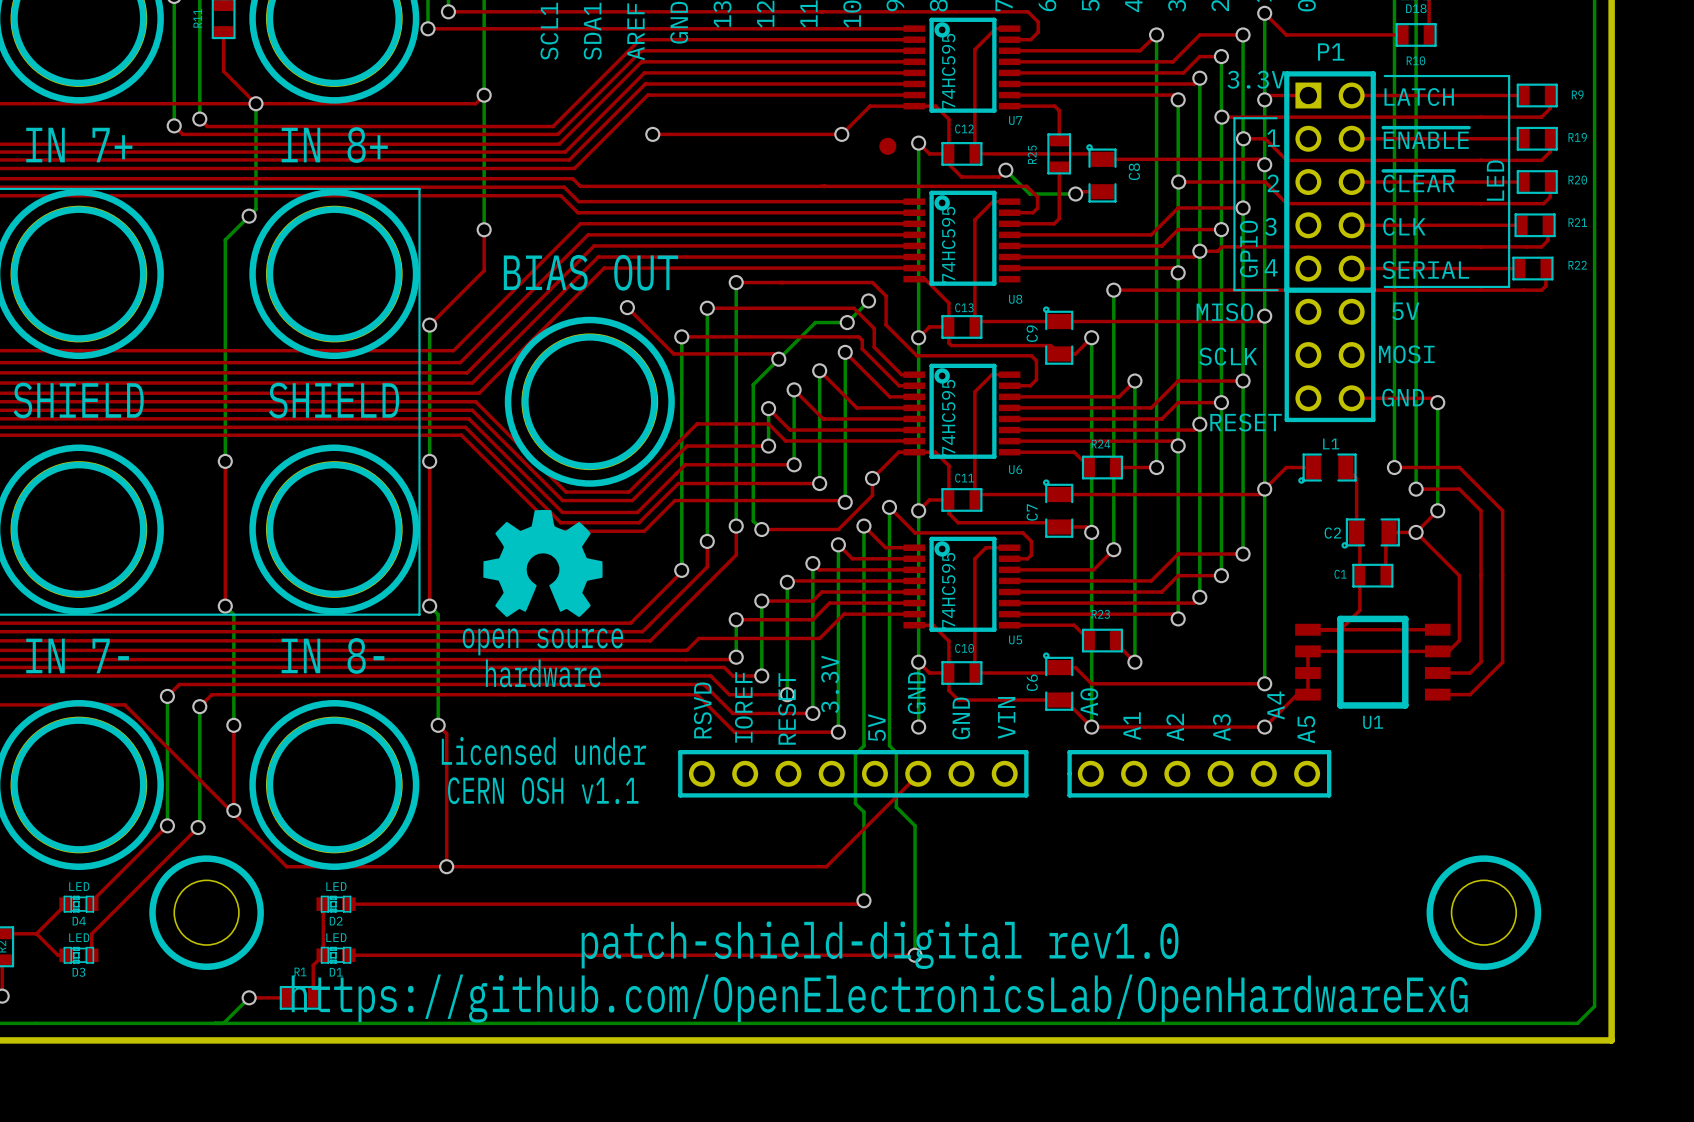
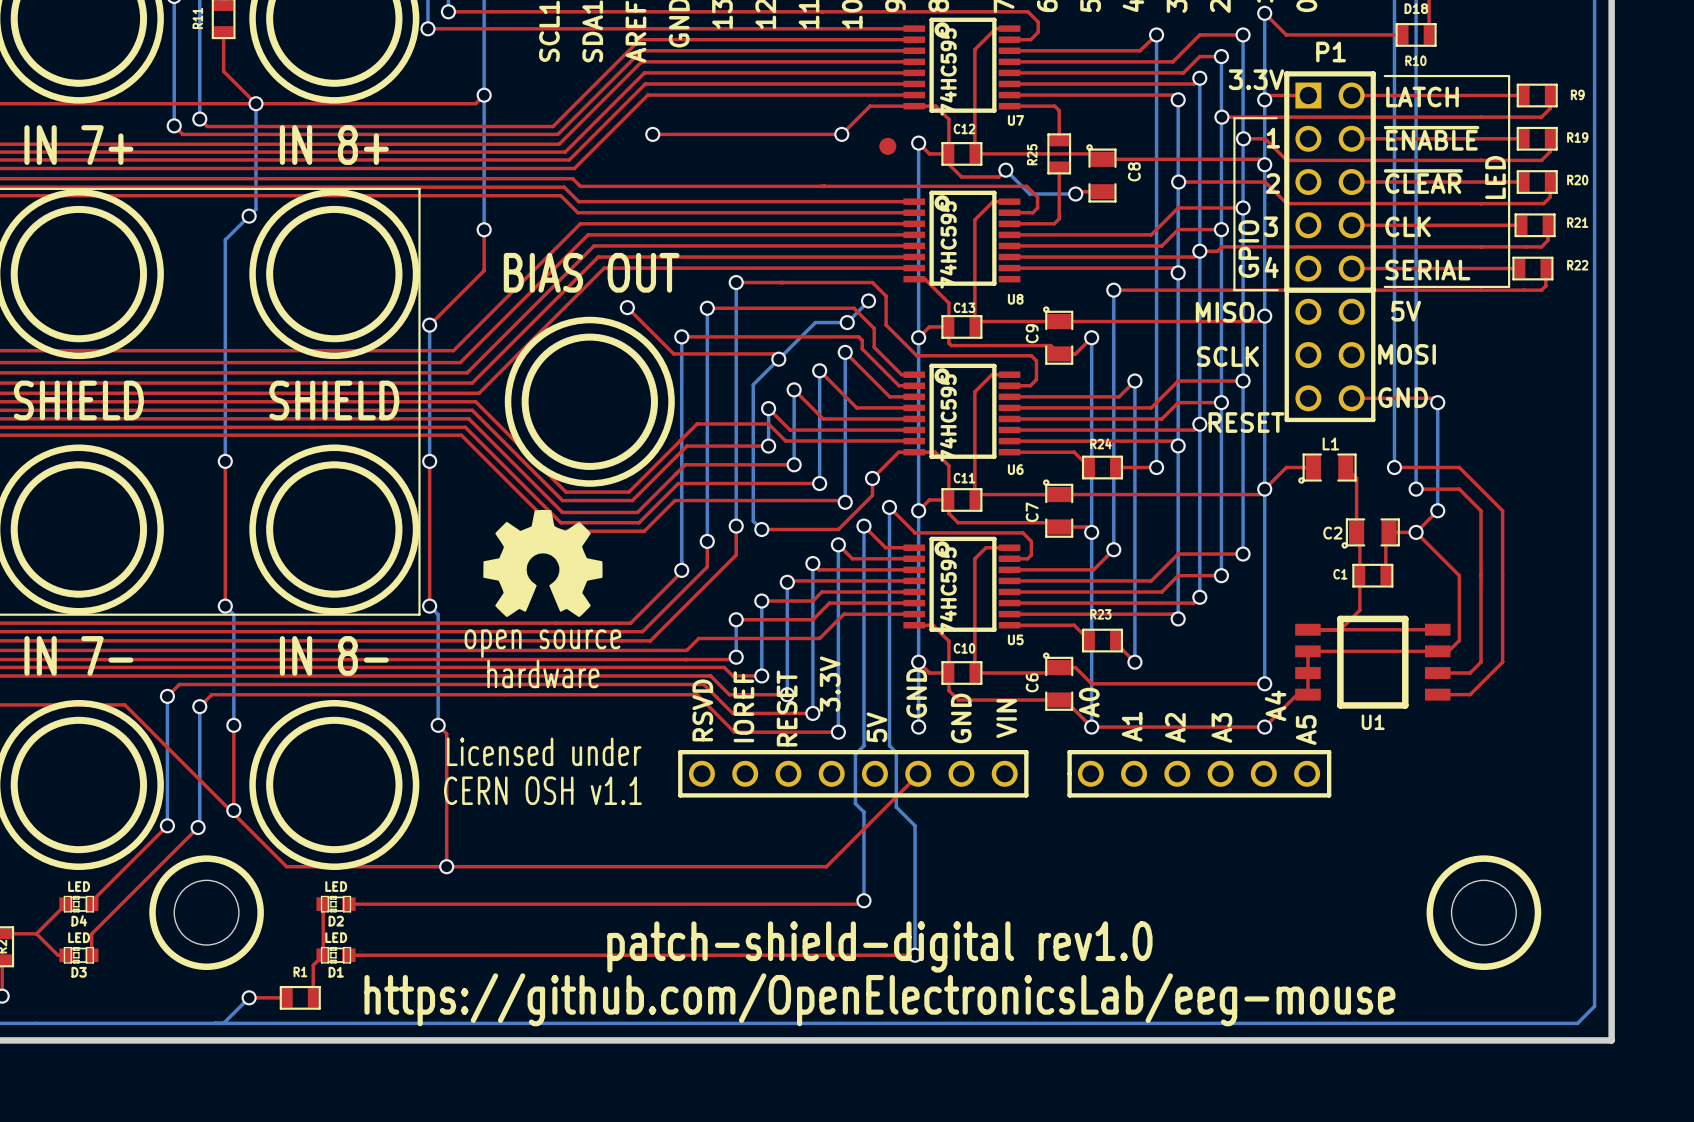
text: https://github.com/OpenElectronicsLab/OpenHardwareExG (879, 998) -> https://github.com/OpenElectronicsLab/eeg-mouse (879, 999)

